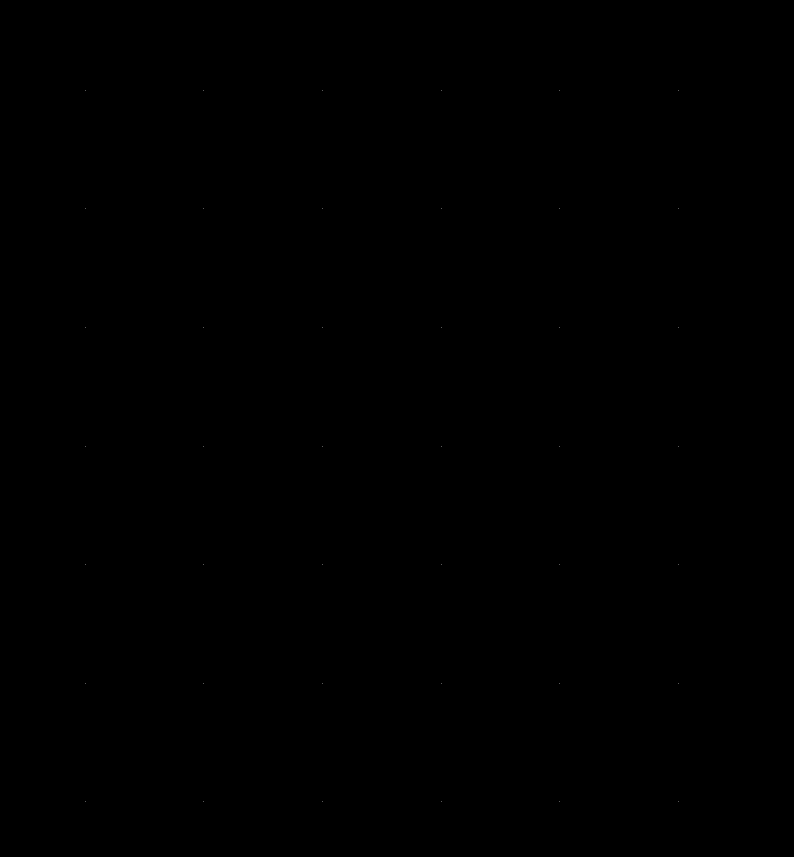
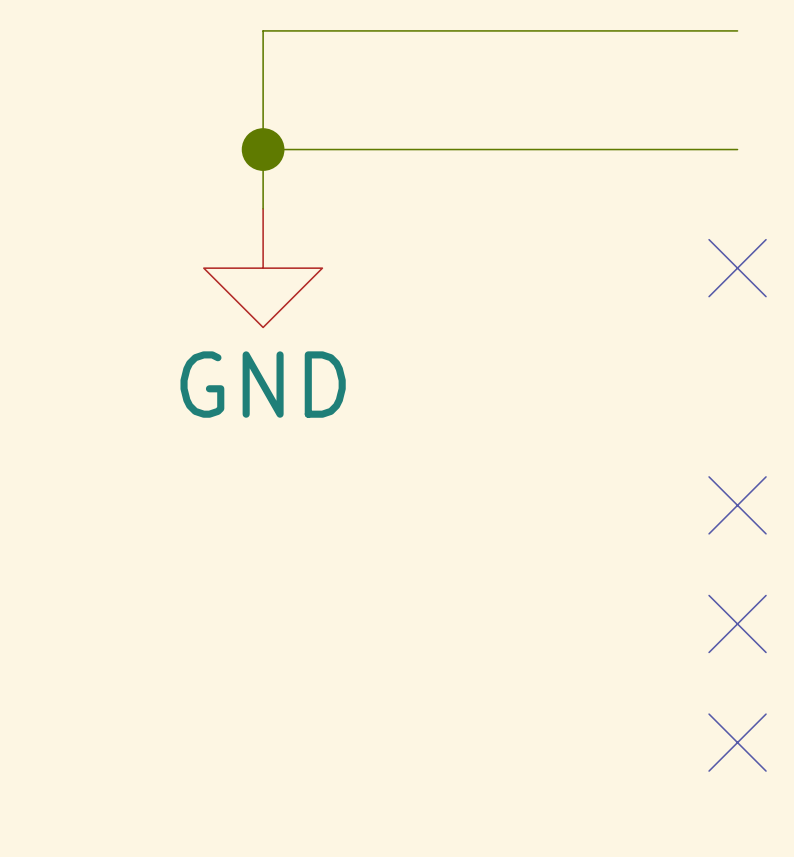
wire: none -> (737, 30) (263, 30) (263, 208)
wire: none -> (263, 149) (737, 149)
junction: none -> (263, 149)
power symbol: none -> GND (263, 268)
no-connect mark: none -> (737, 268)
no-connect mark: none -> (737, 505)
no-connect mark: none -> (737, 623)
no-connect mark: none -> (737, 742)

